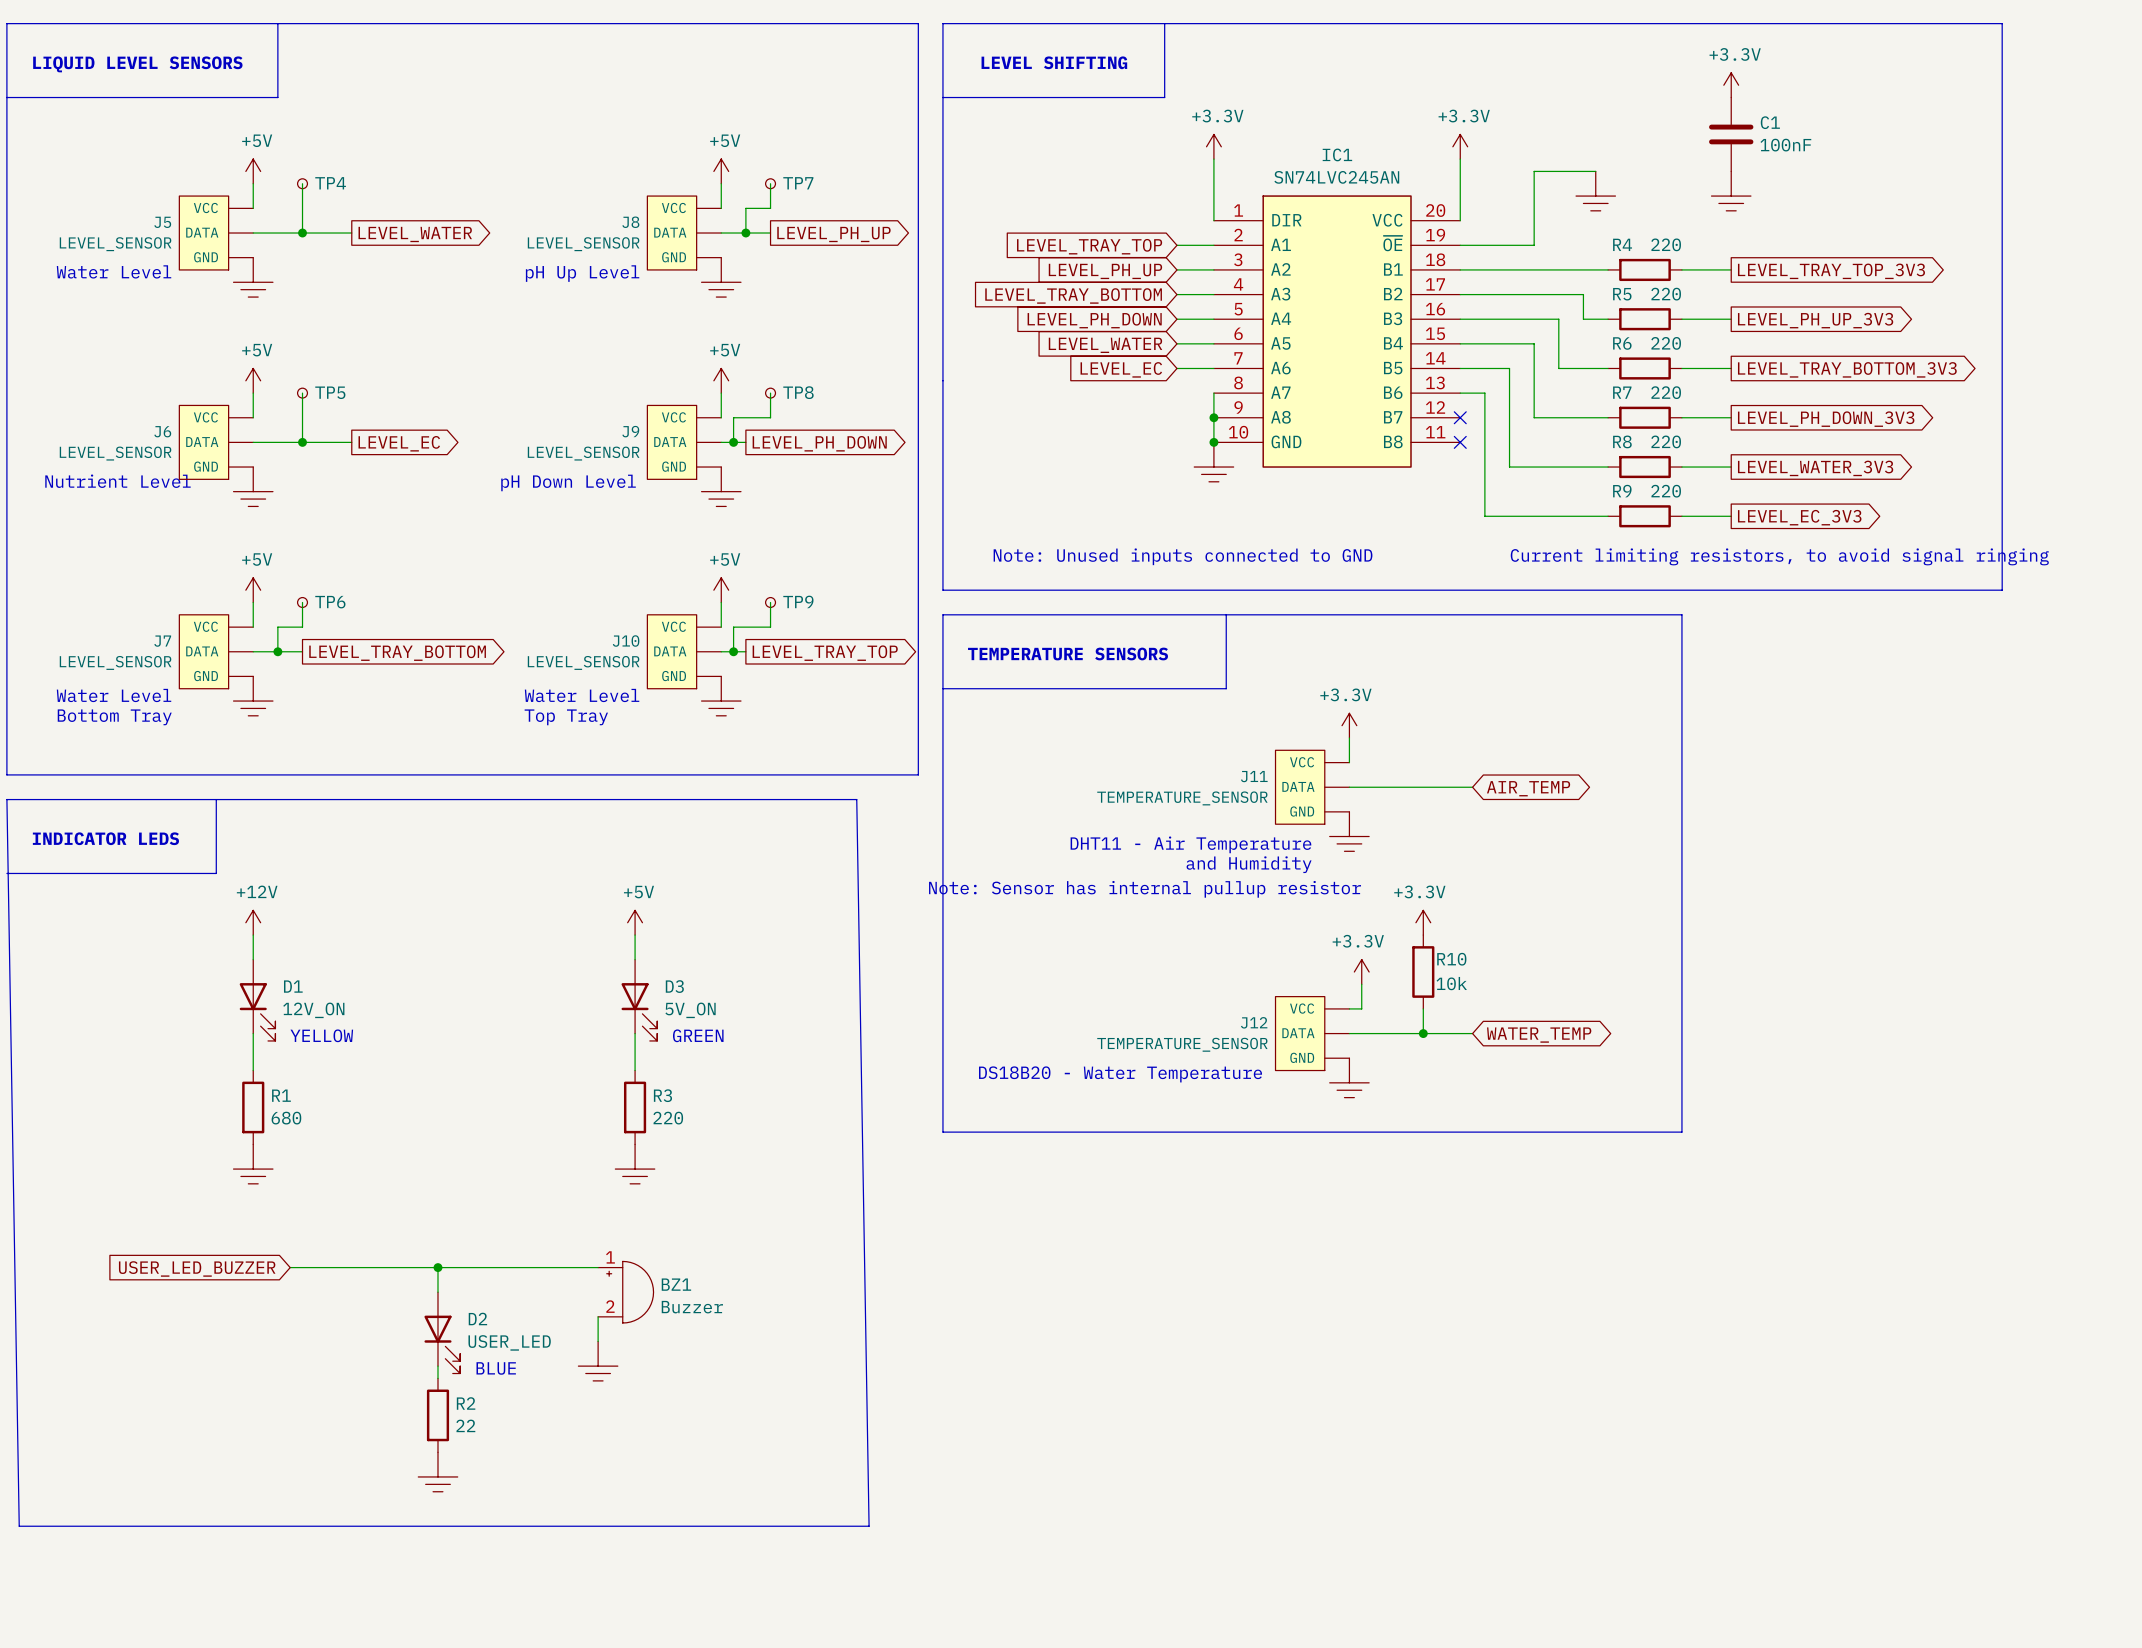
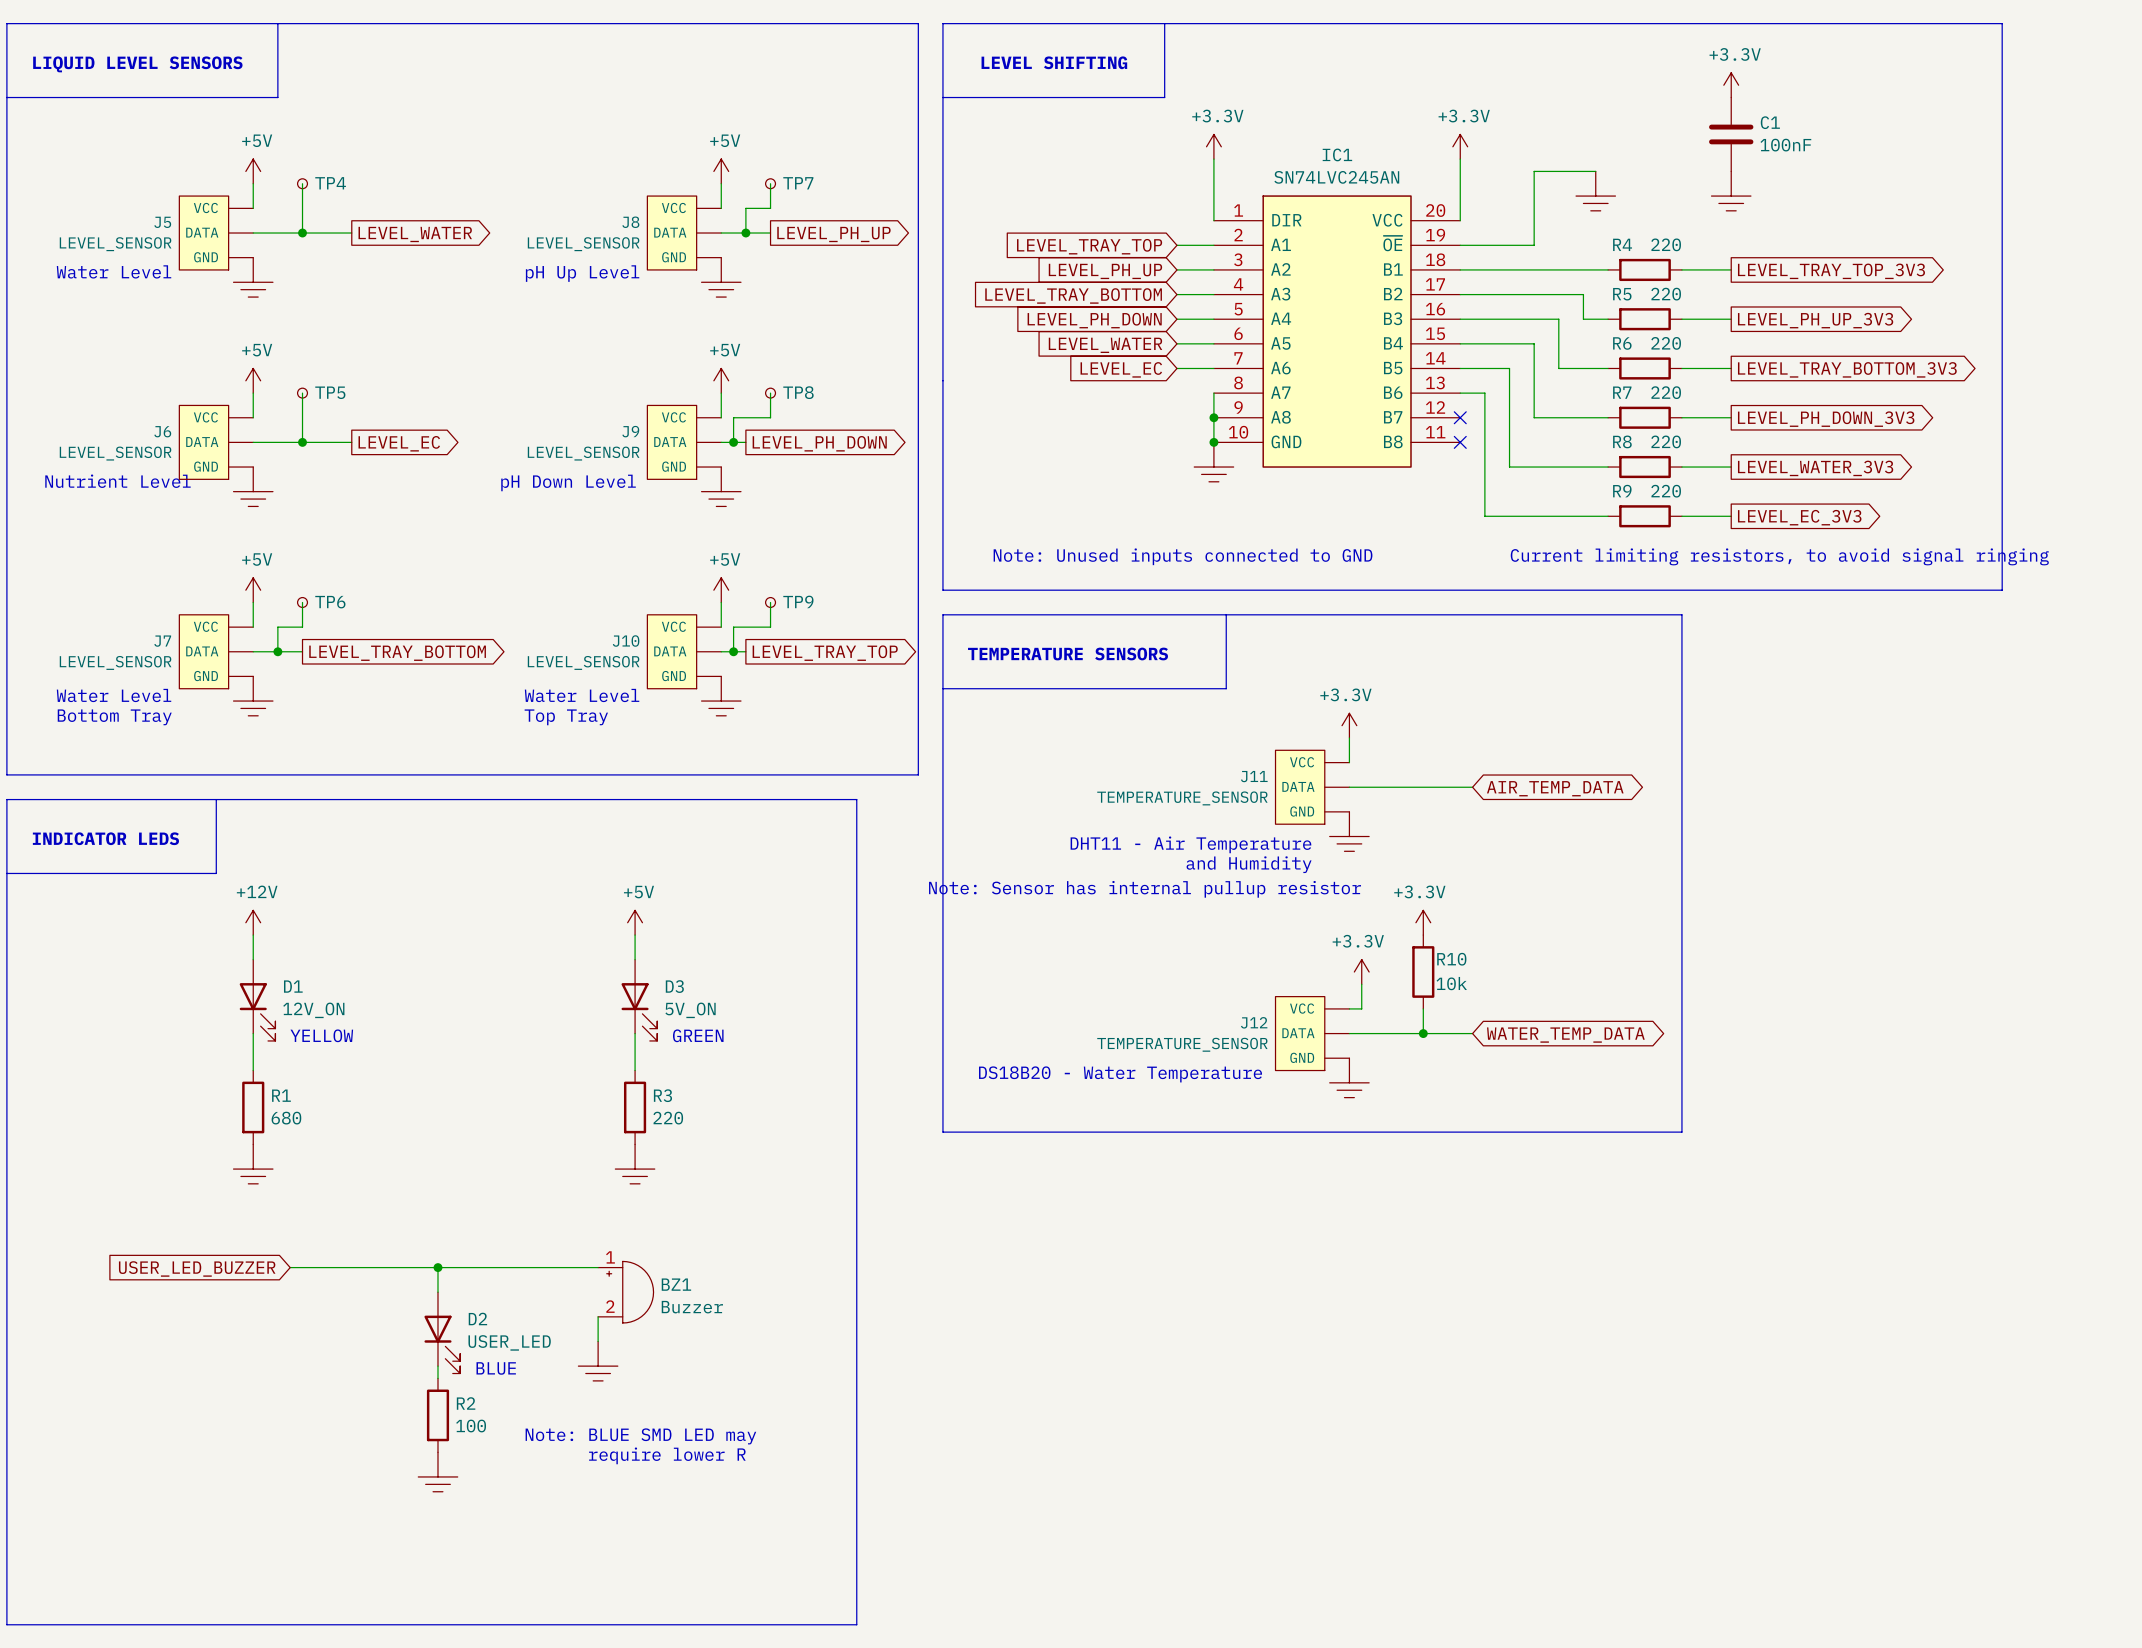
global label: AIR_TEMP (1528, 788) -> AIR_TEMP_DATA (1555, 788)
line: (6, 799) (19, 1526) (869, 1526) (856, 799) -> (6, 799) (6, 1624) (856, 1624) (856, 799)
global label: WATER_TEMP (1539, 1035) -> WATER_TEMP_DATA (1565, 1035)
R2 value: 22 (465, 1425) -> 100 (471, 1426)
text: none -> Note: BLUE SMD LED may (640, 1436)
text: none -> require lower R (667, 1455)

